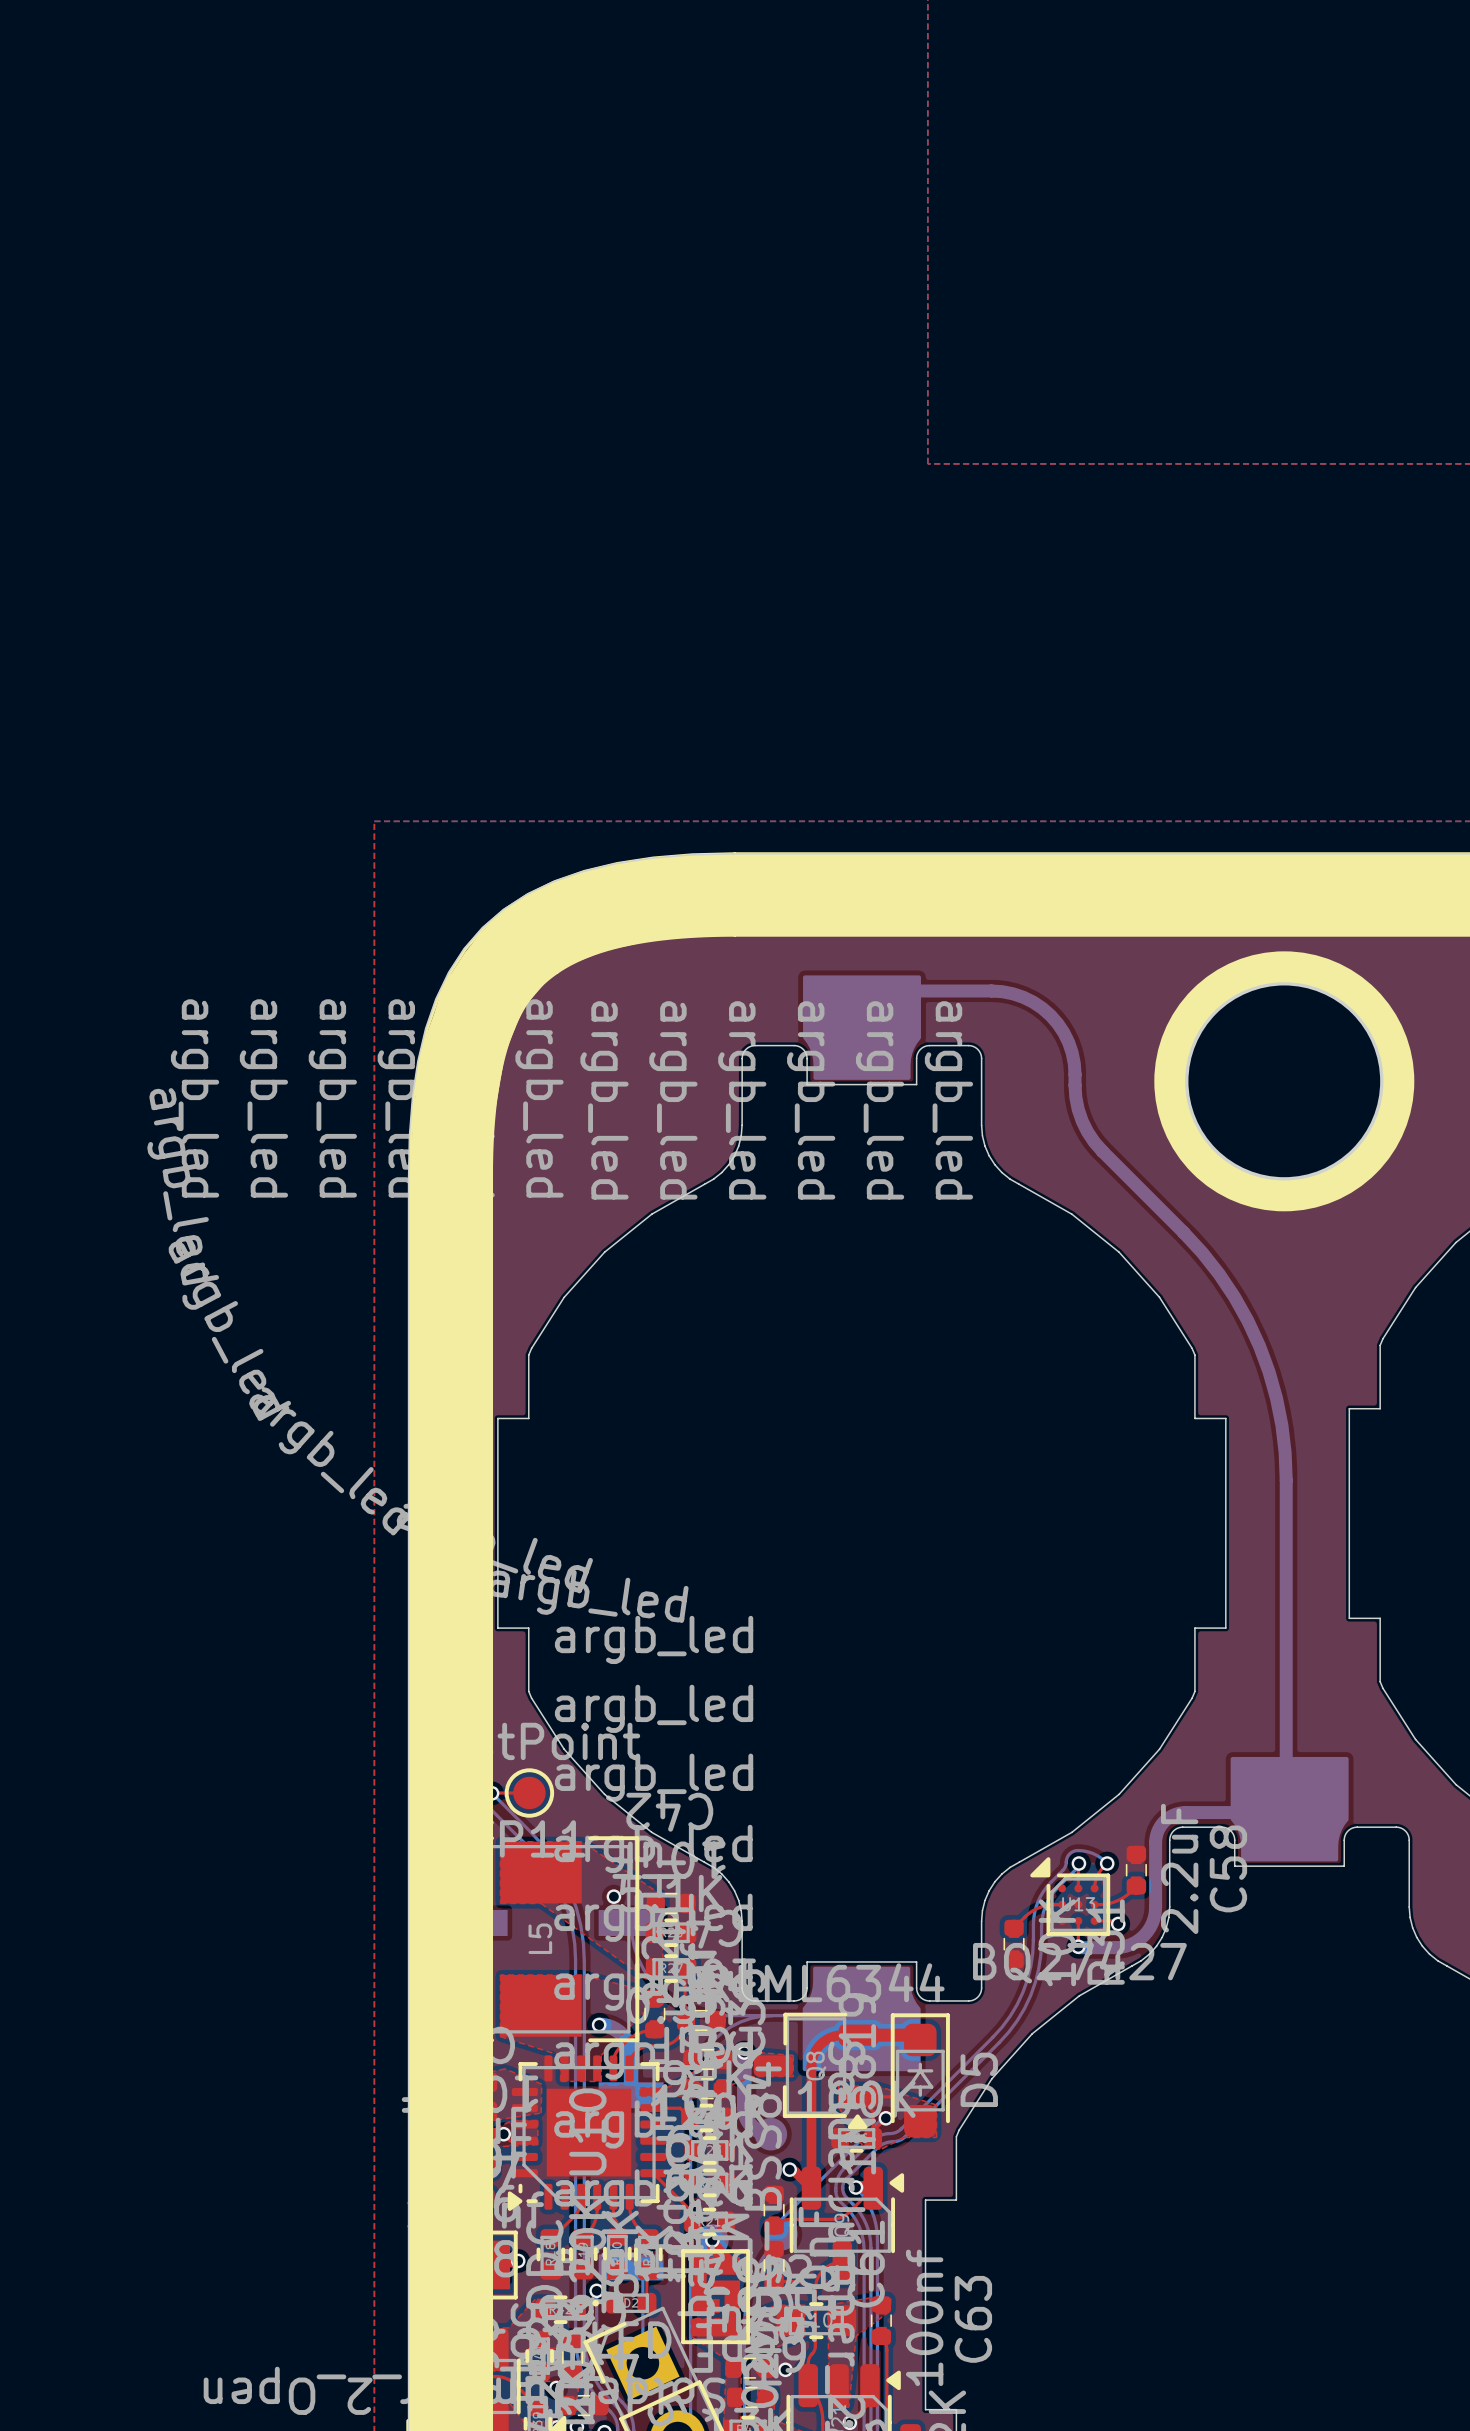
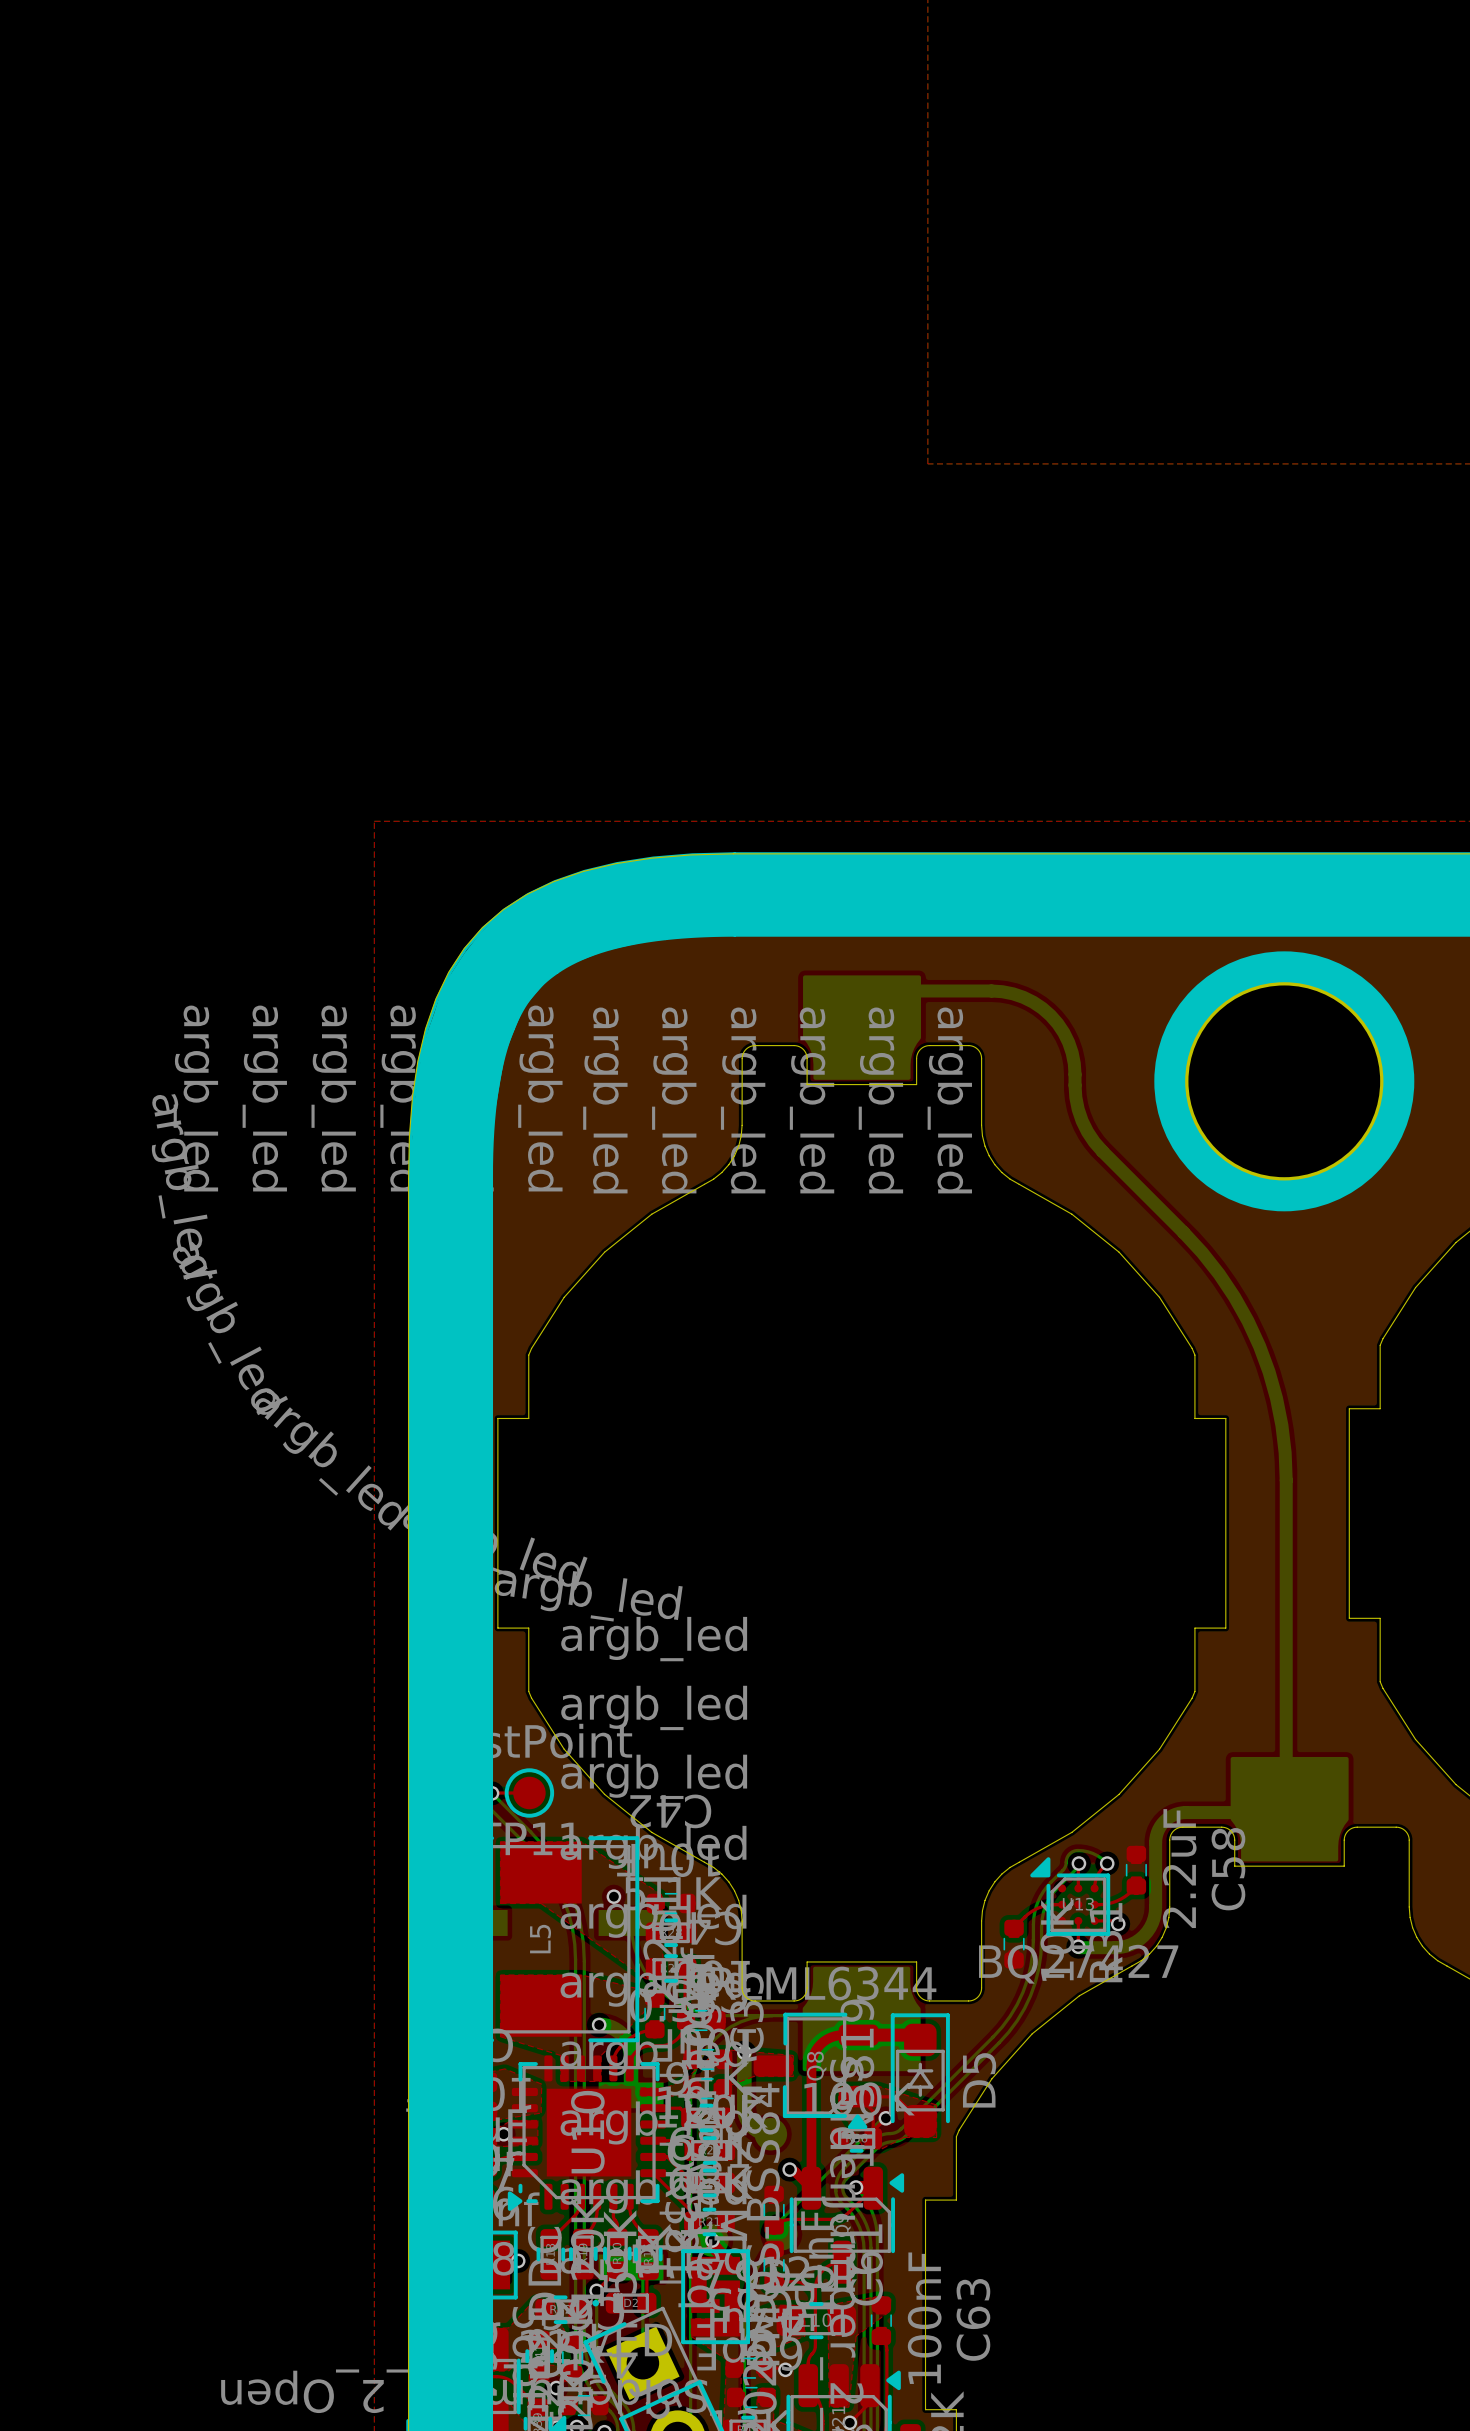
C63 value: 100nf (924, 2317) -> 100nF (924, 2318)

